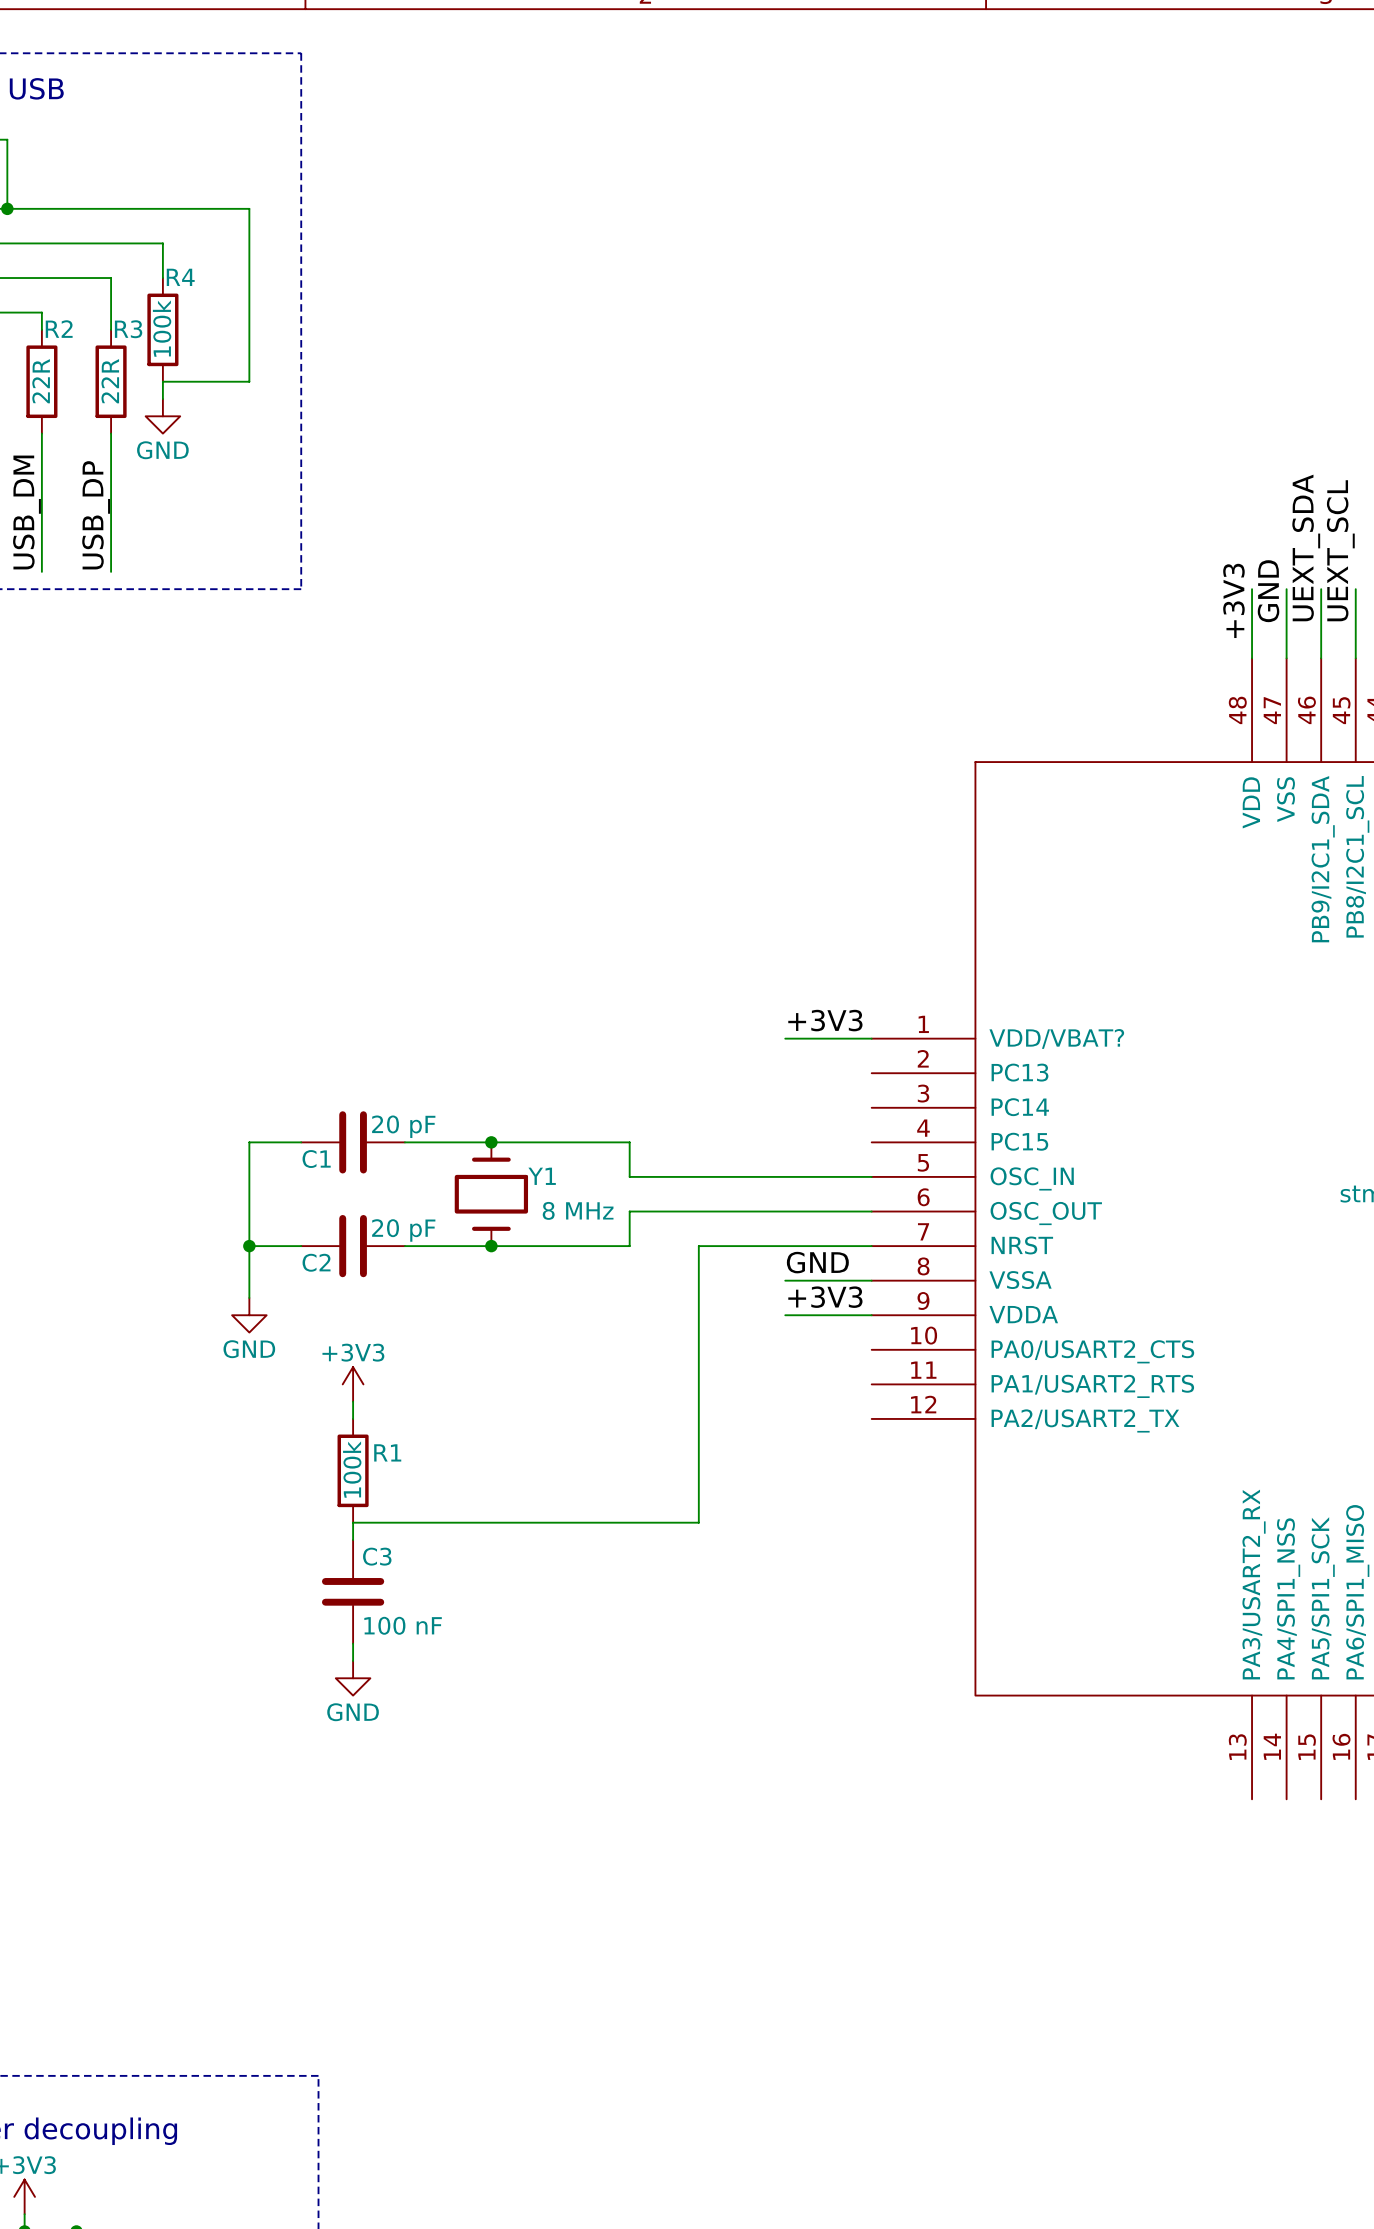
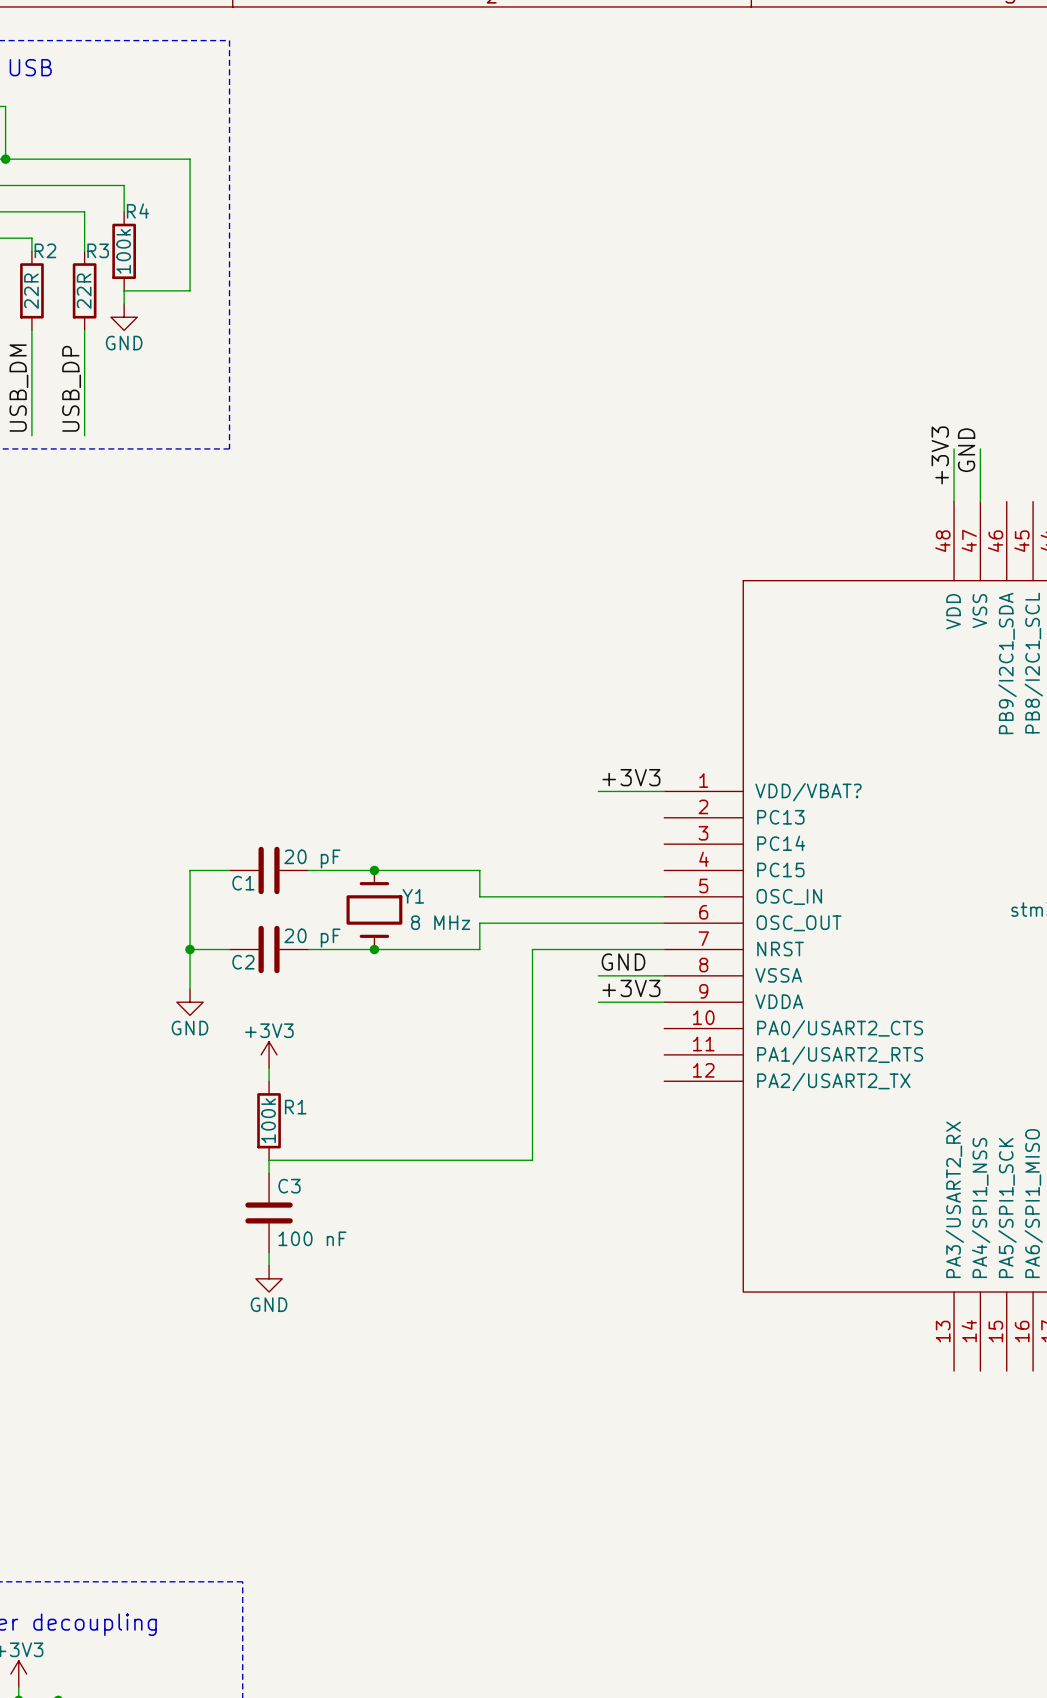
label: UEXT_SDA (1306, 547) -> none
label: UEXT_SCL (1340, 550) -> none
wire: (1321, 589) (1321, 658) -> none
wire: (1355, 589) (1355, 658) -> none

